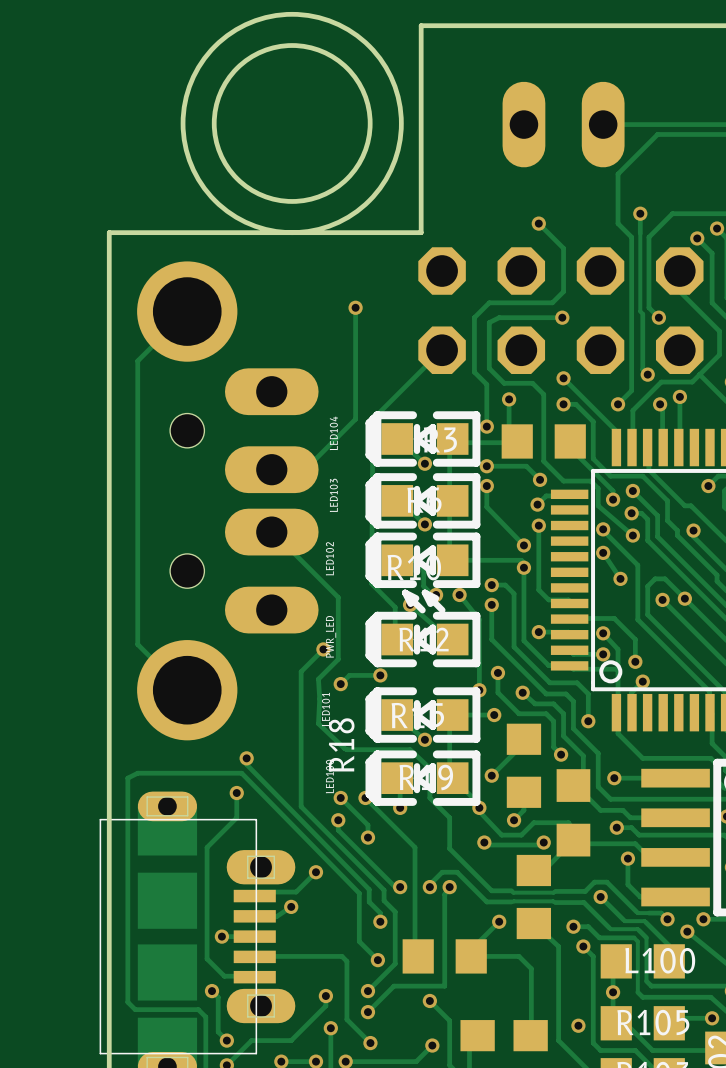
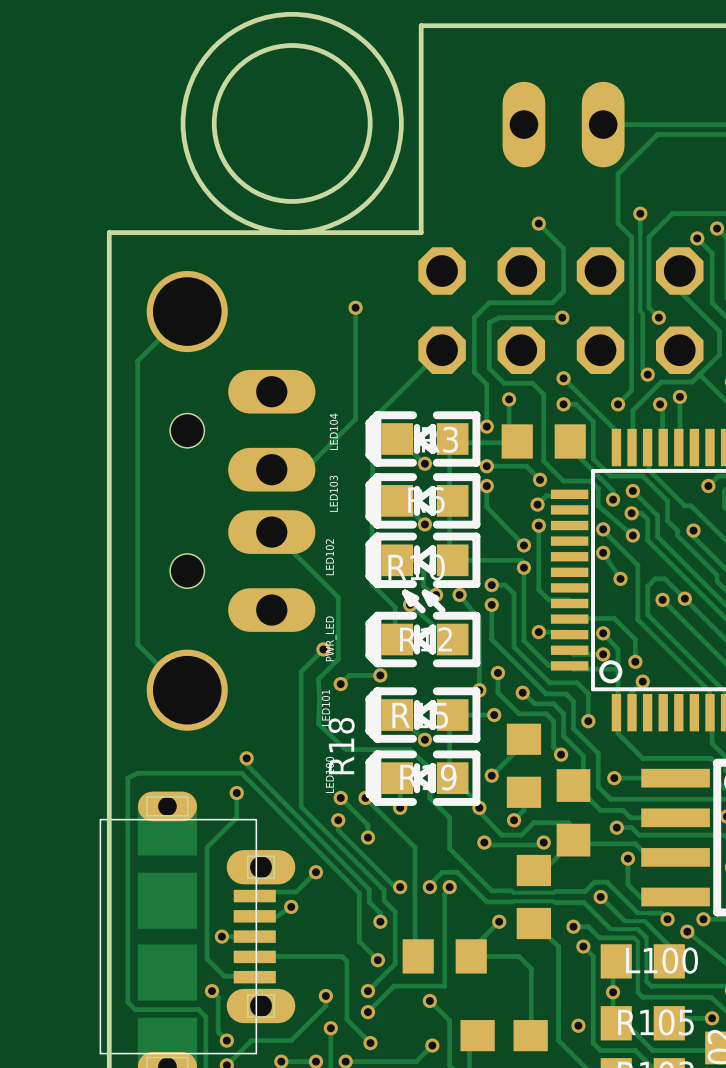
part footprint: [137, 261, 319, 741] -> [146, 271, 316, 731]

